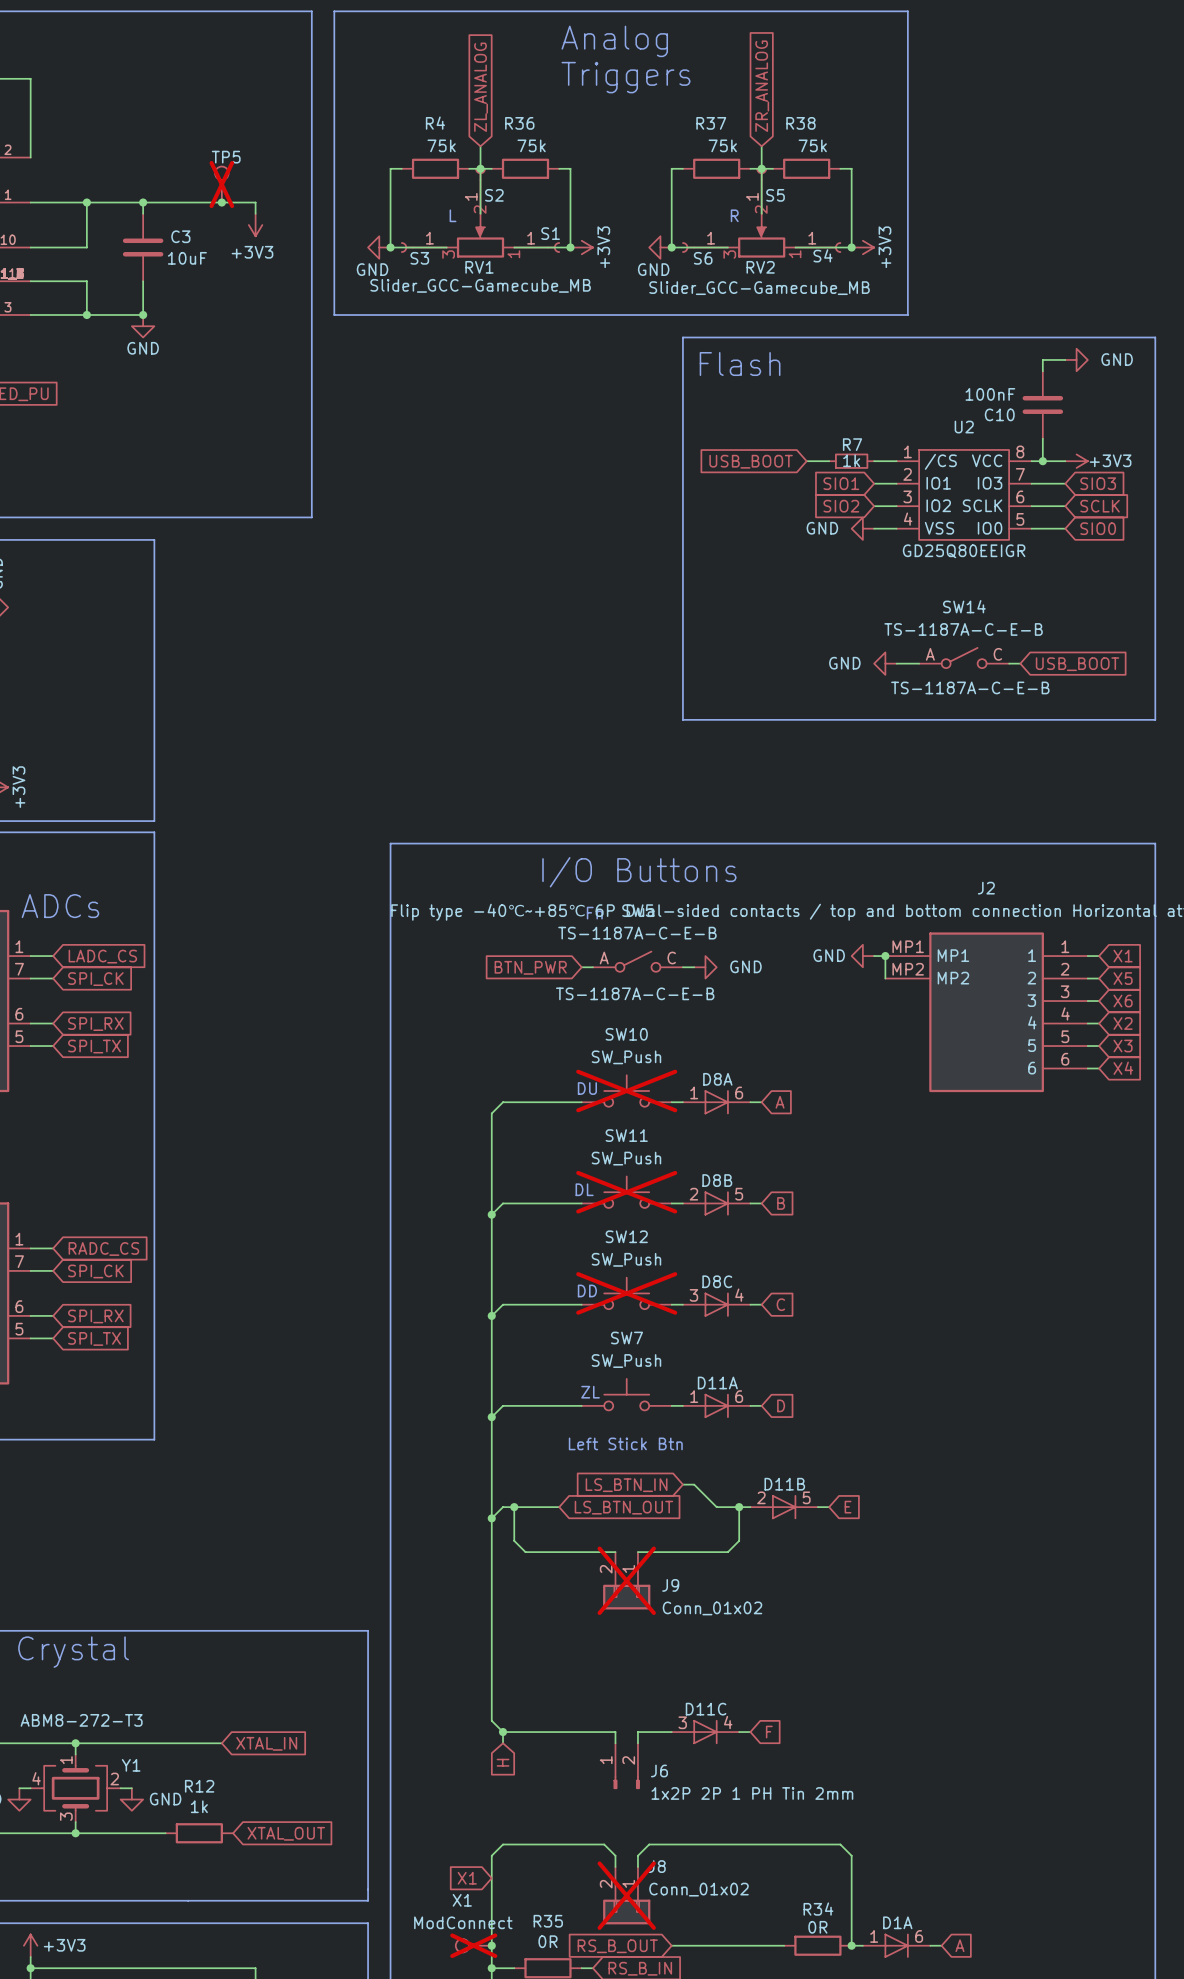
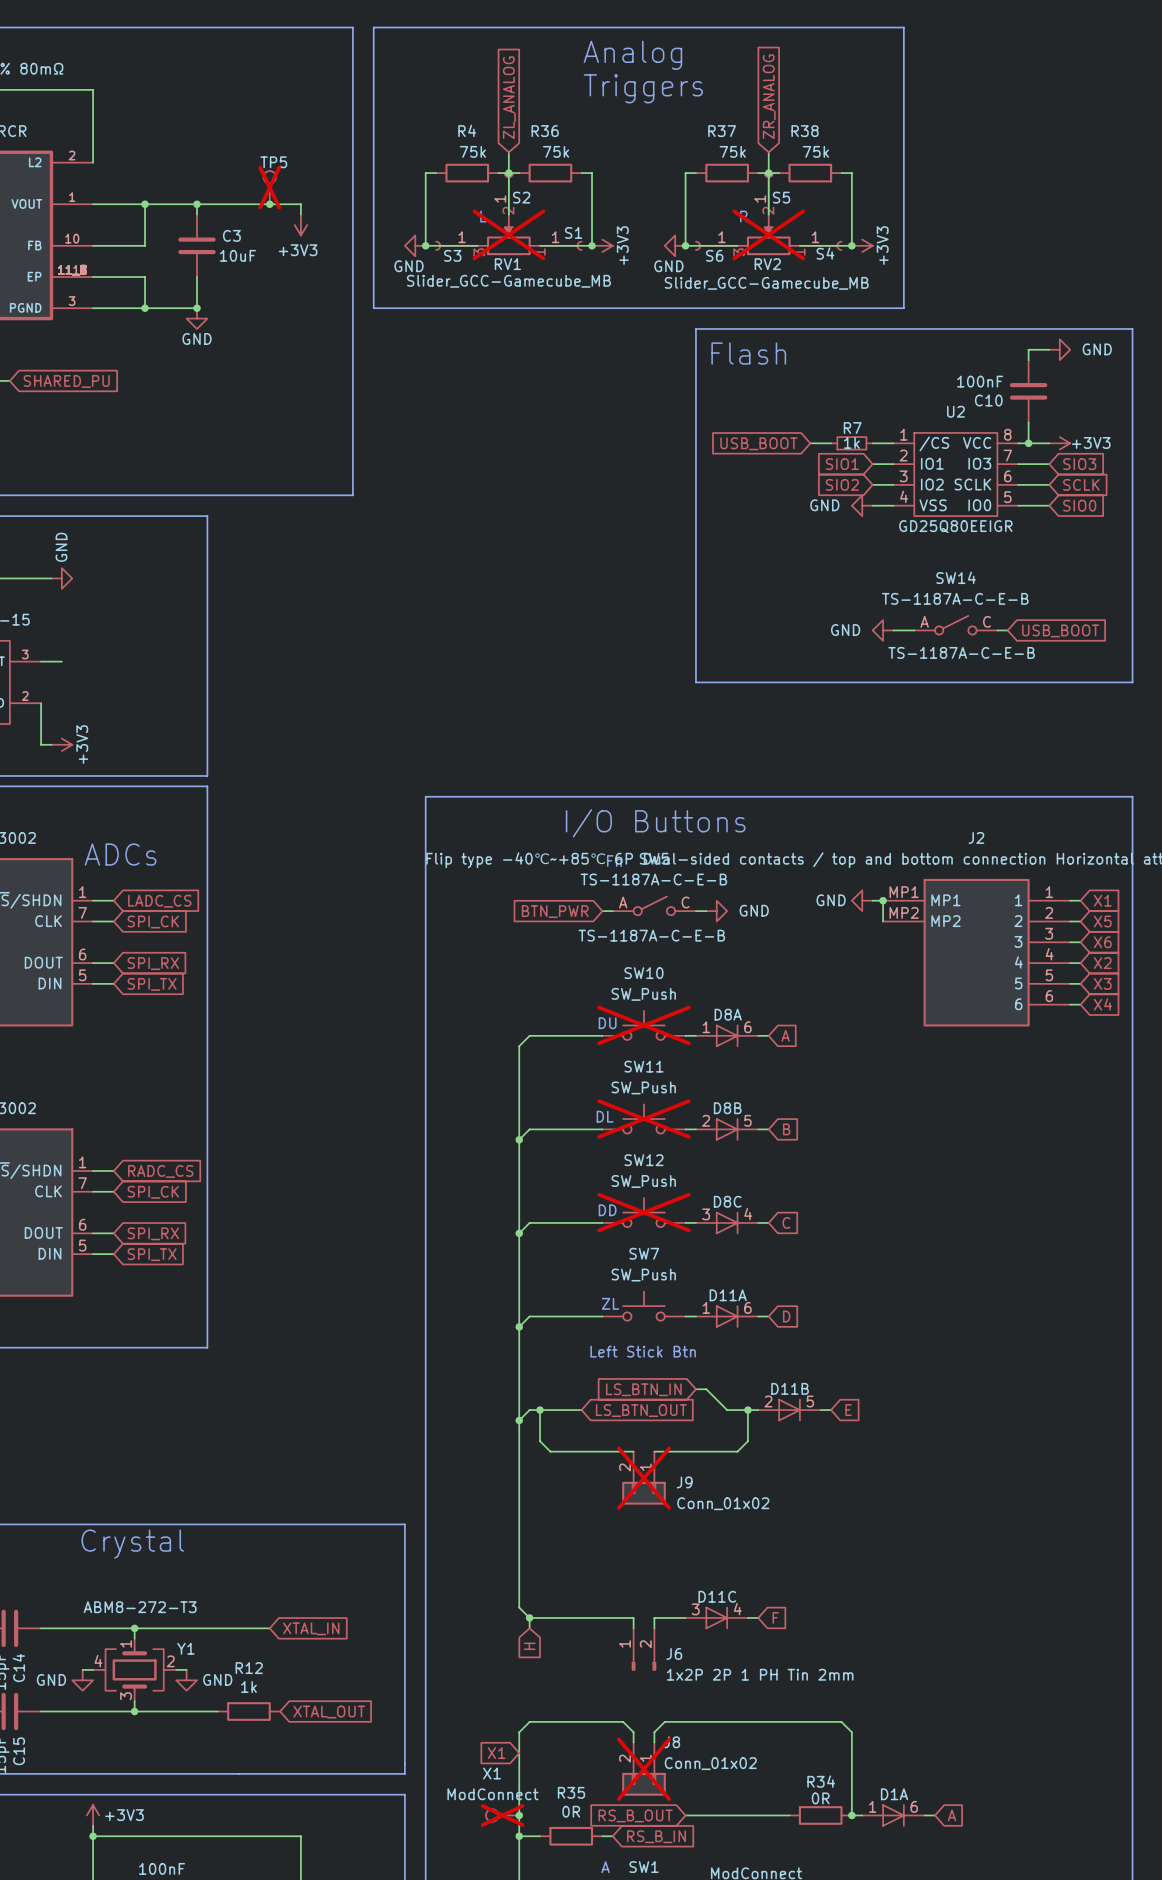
RV1 do-not-place cross: none -> (508, 234)
RV2 do-not-place cross: none -> (768, 234)

